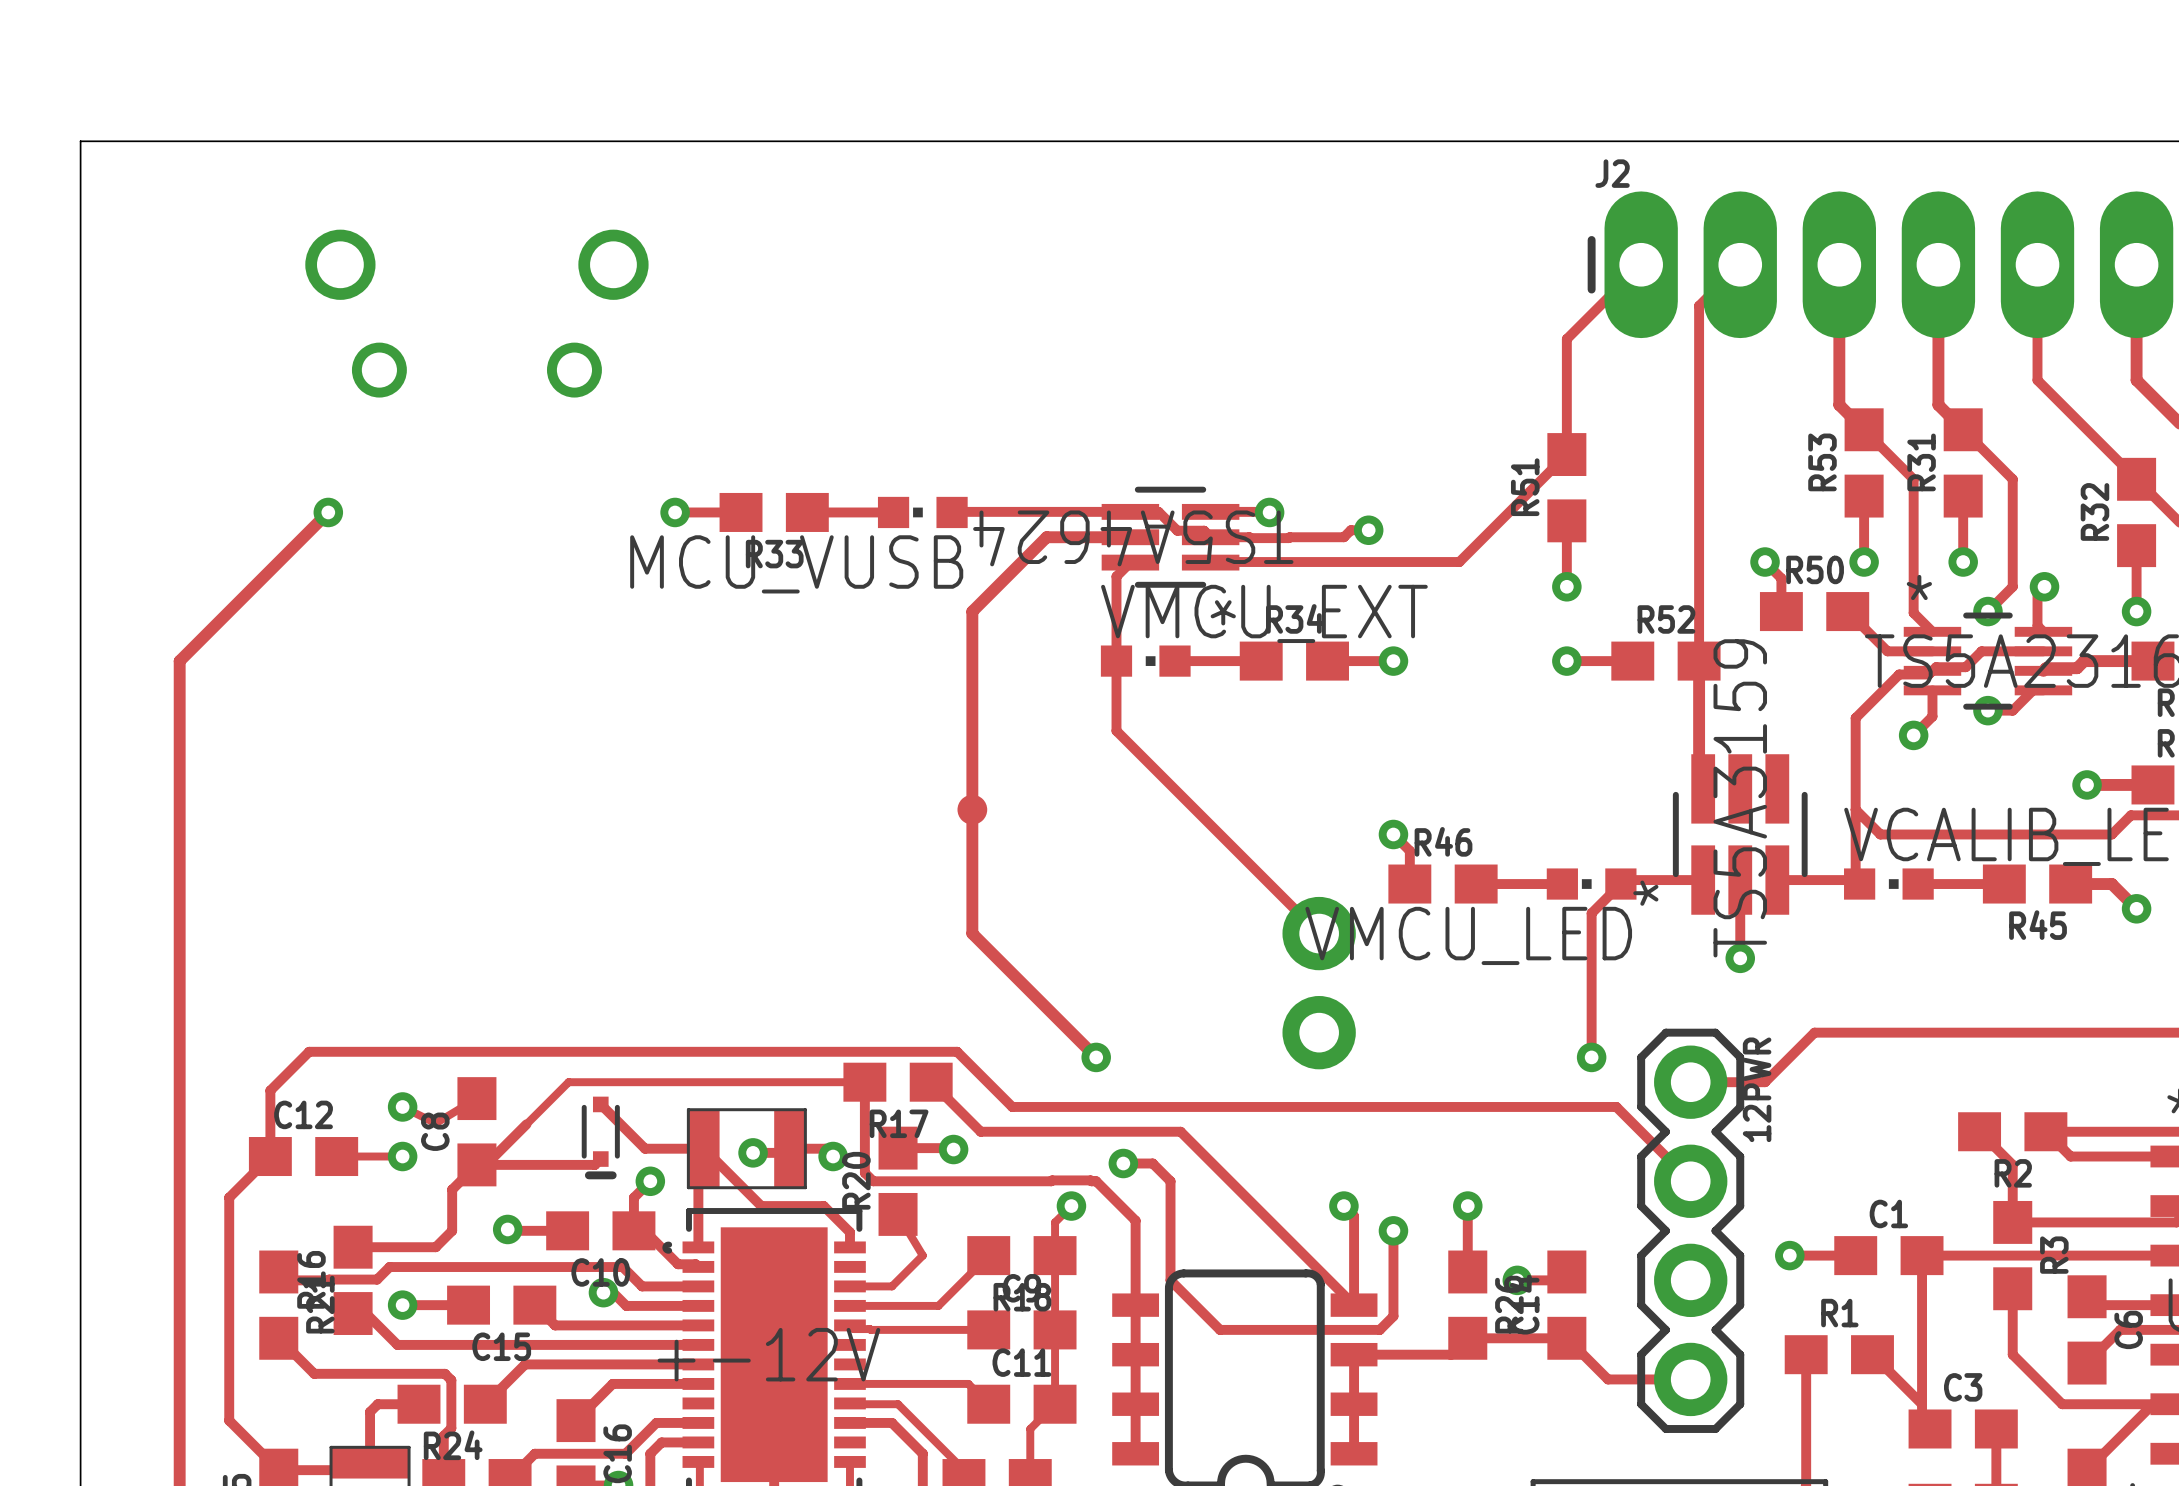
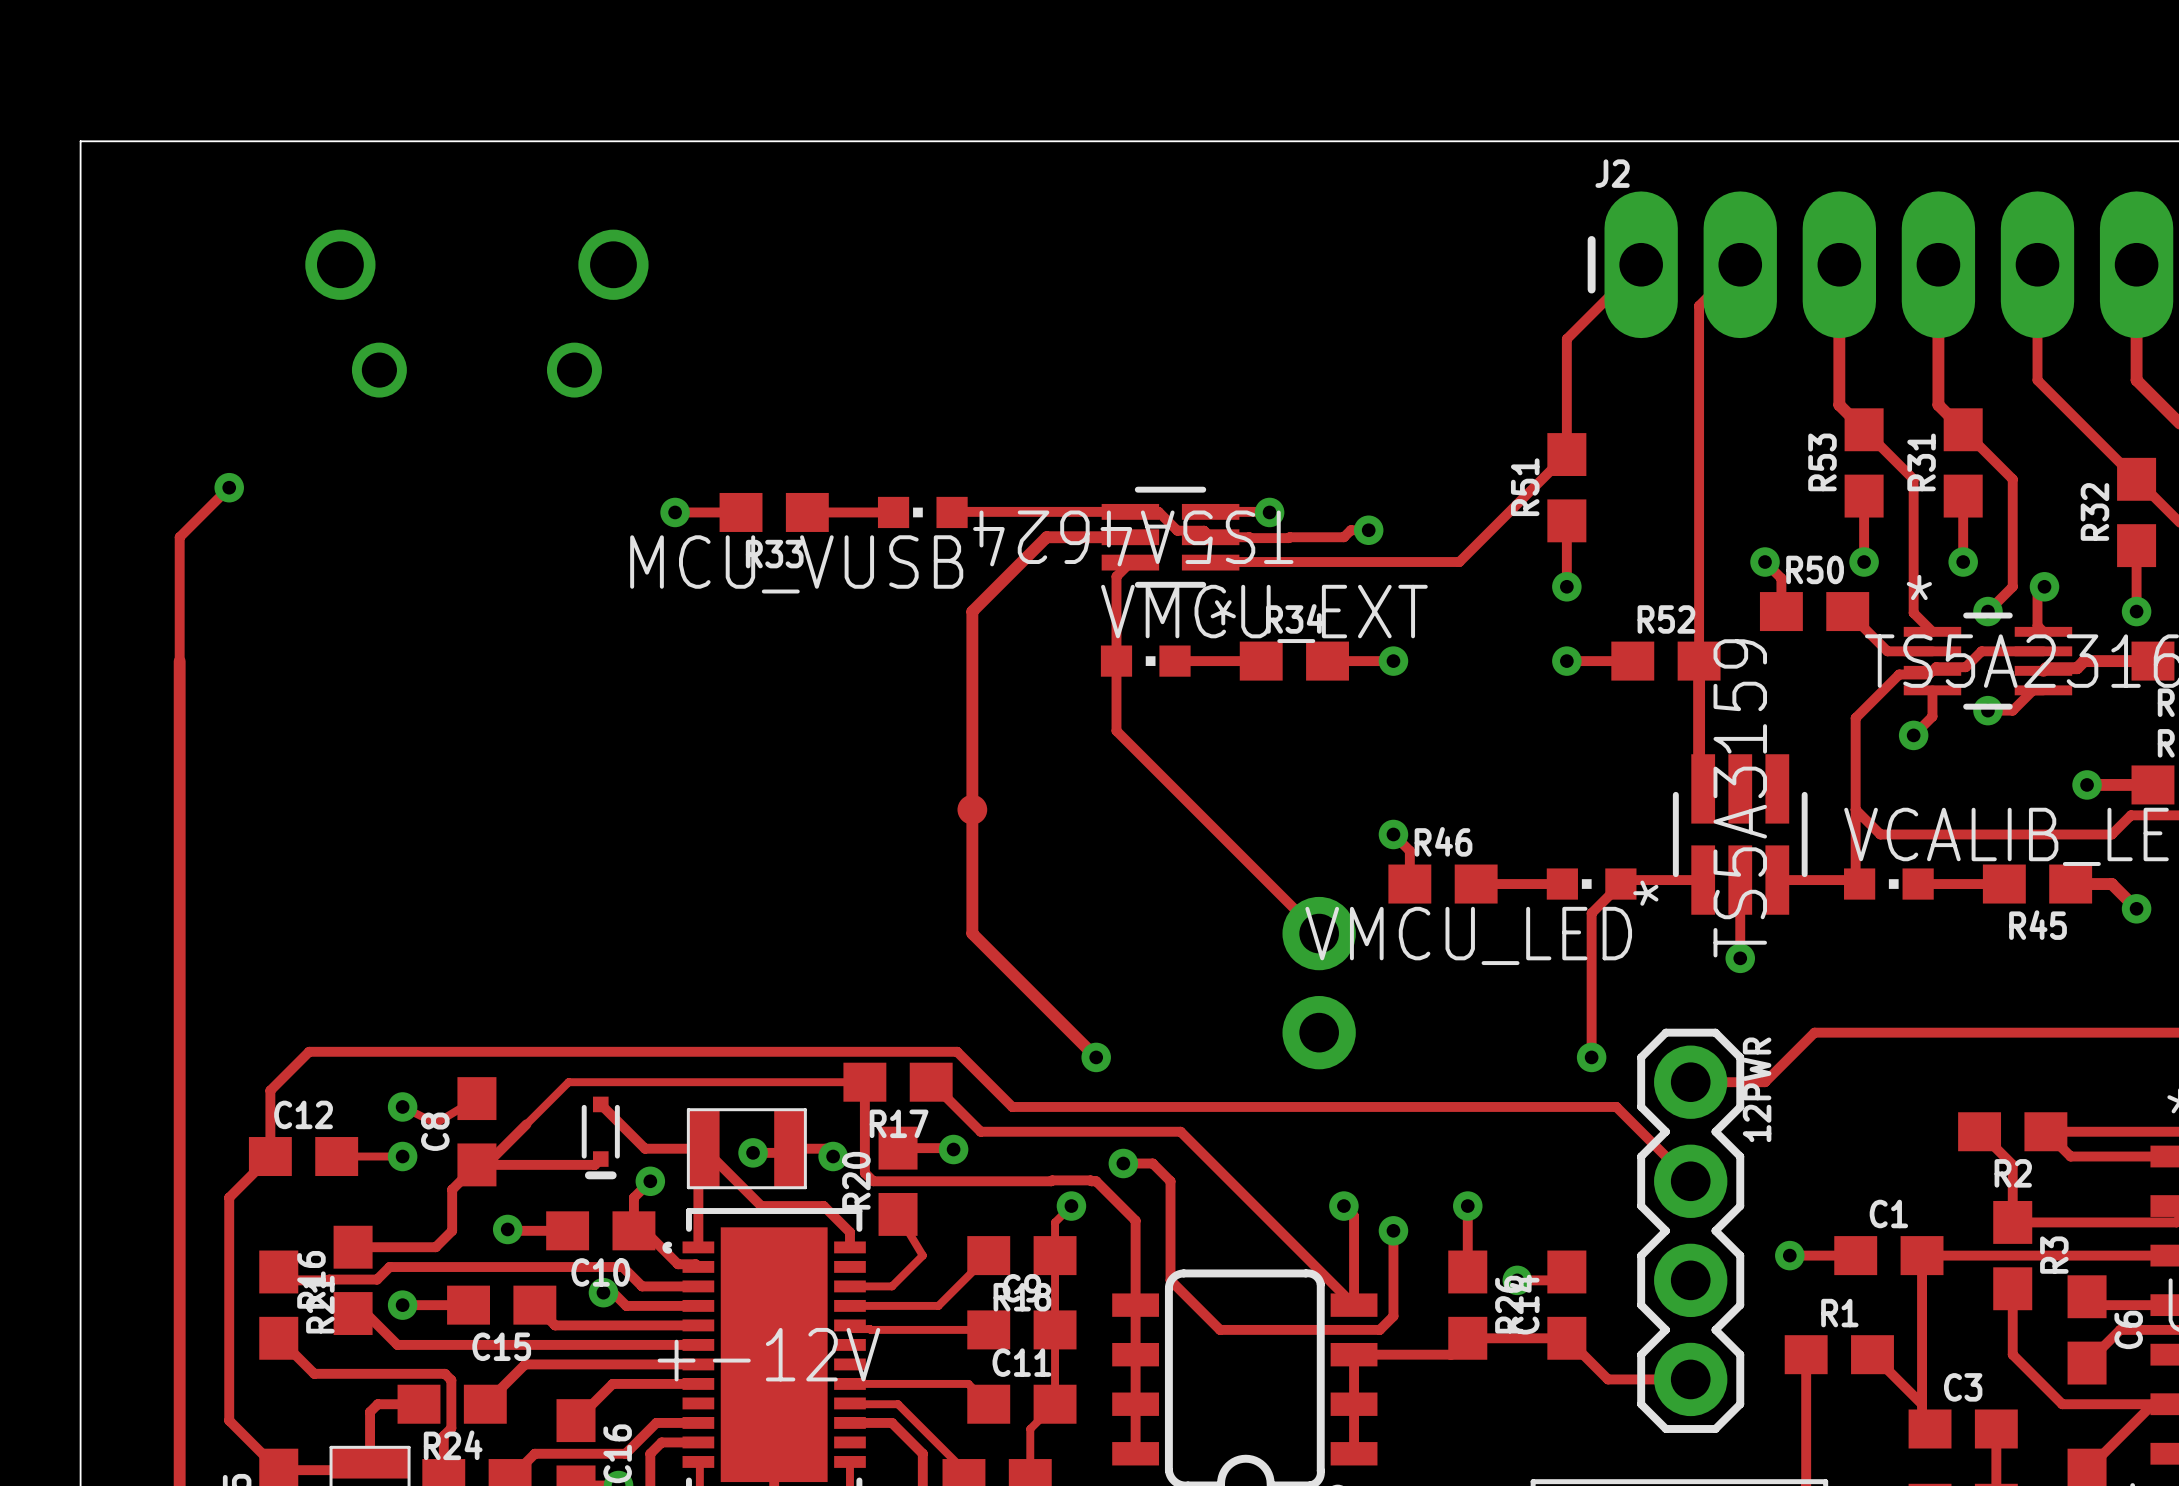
track: (328, 512) (179, 661) -> (229, 487) (179, 537) (179, 661)
via position: (328, 512) -> (229, 487)

